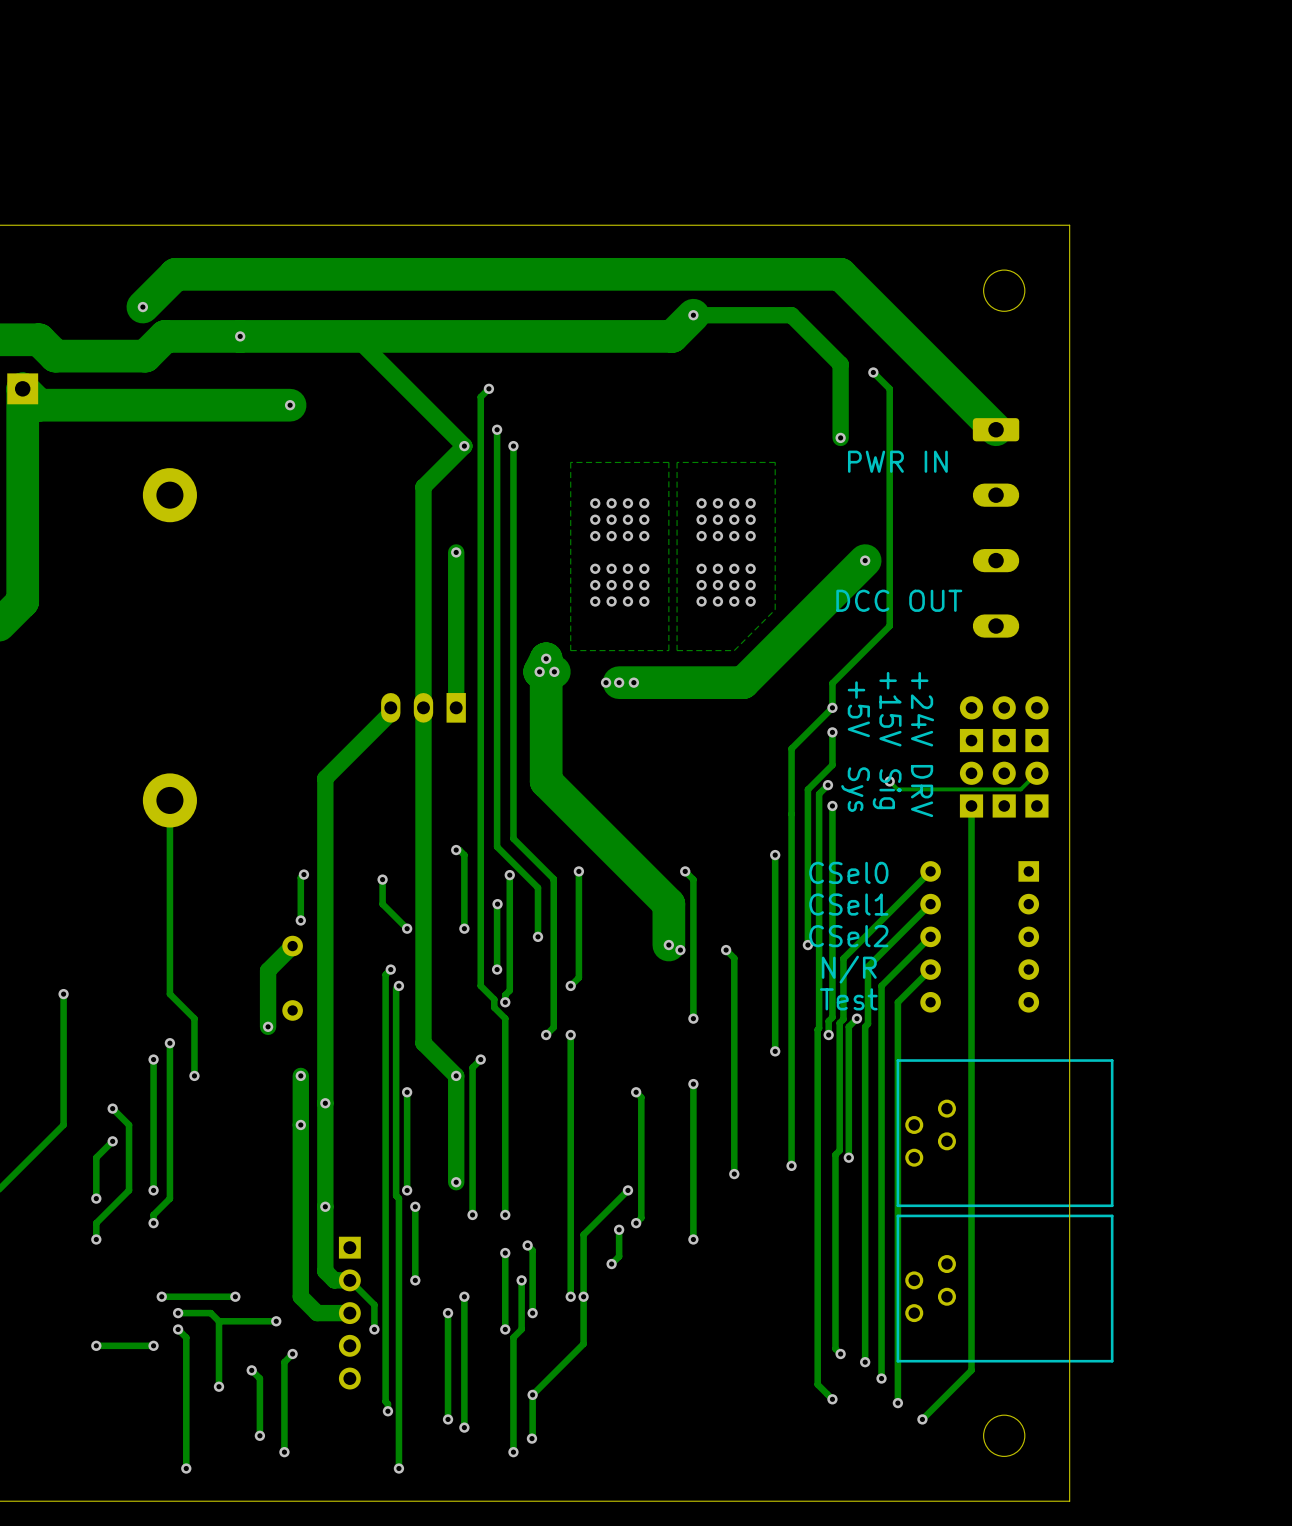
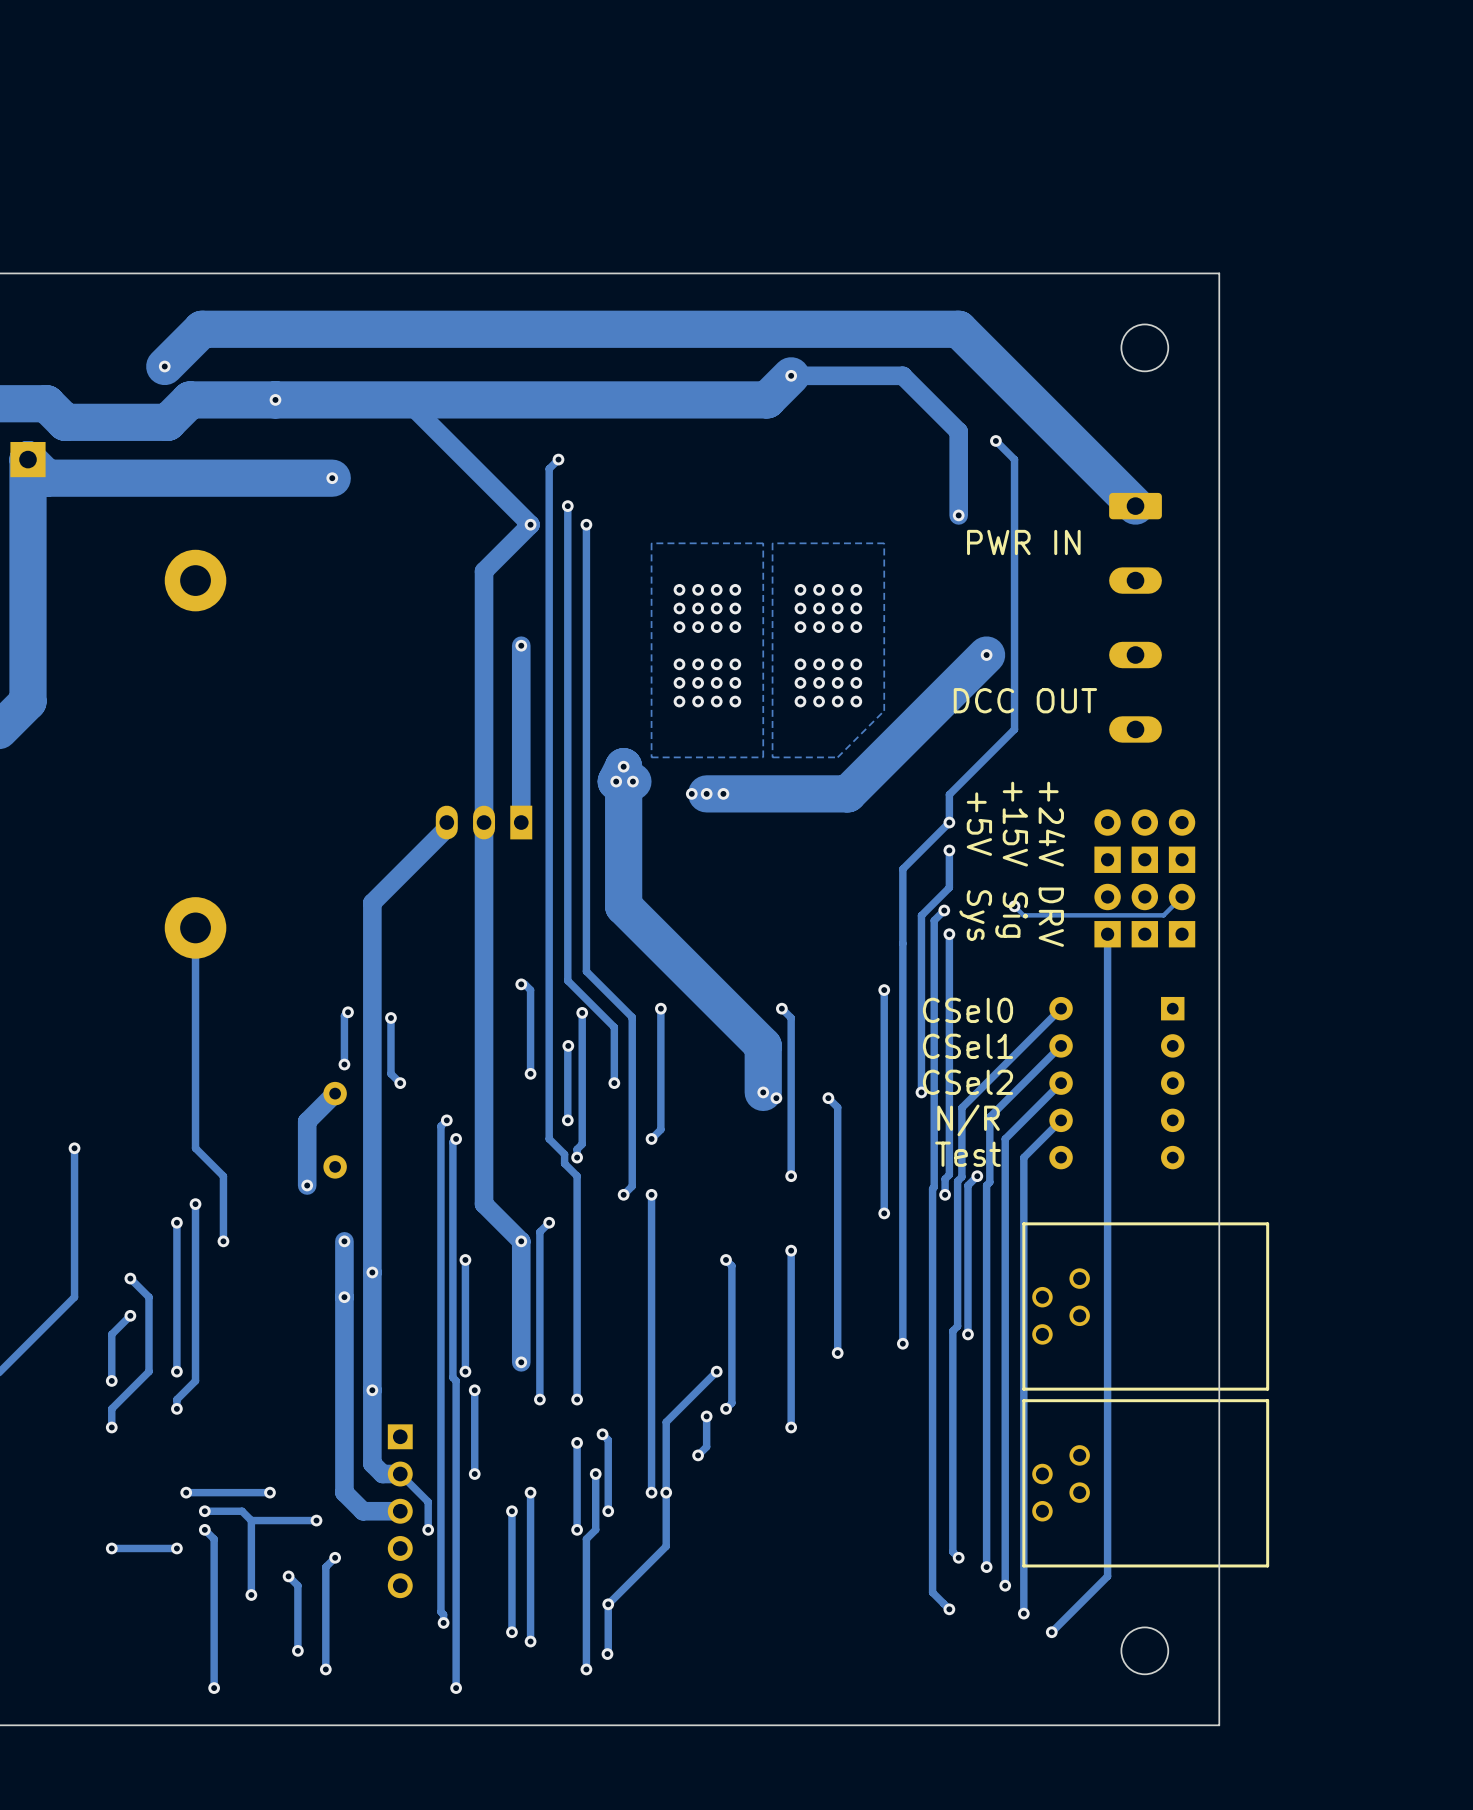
track: none -> (390, 1017) (390, 1073) (400, 1083)
via: none -> (390, 1017)
track: (382, 879) (382, 904) (407, 928) -> none
via: (382, 879) -> none
via: (407, 928) -> none
via: none -> (400, 1083)

